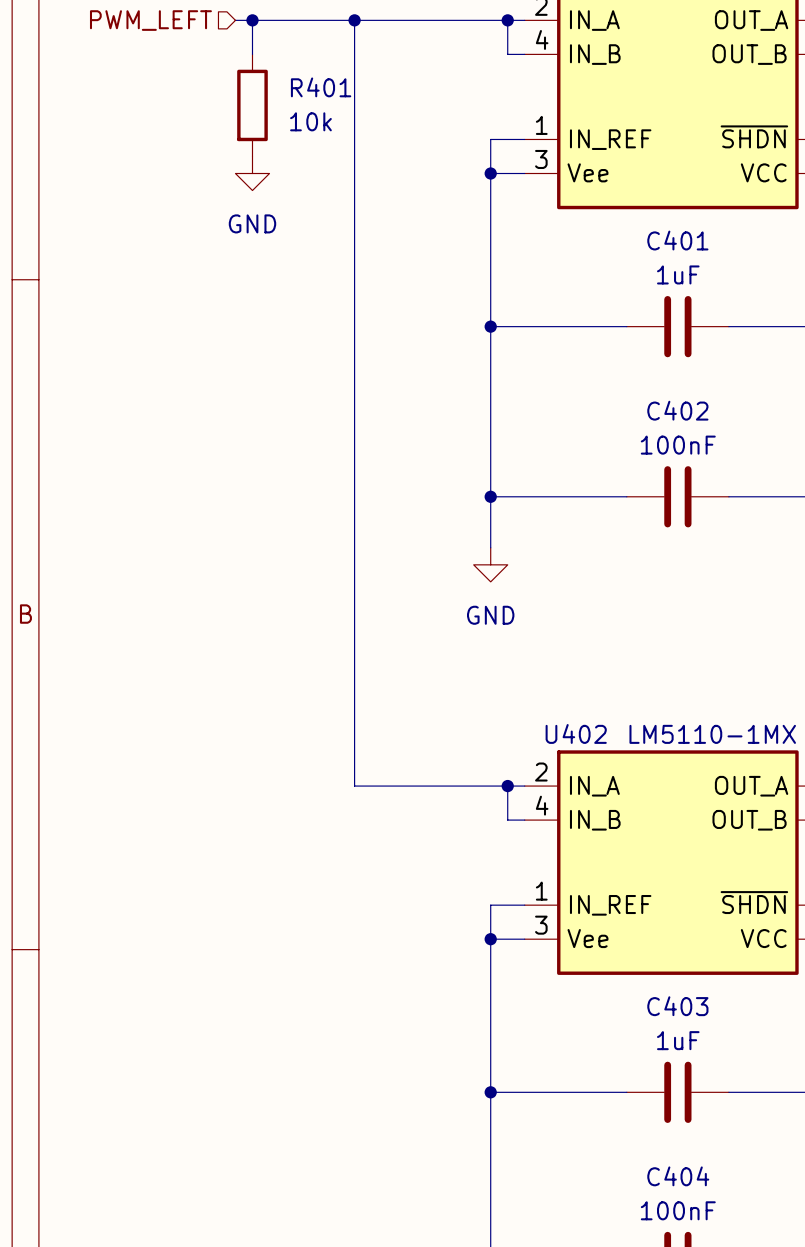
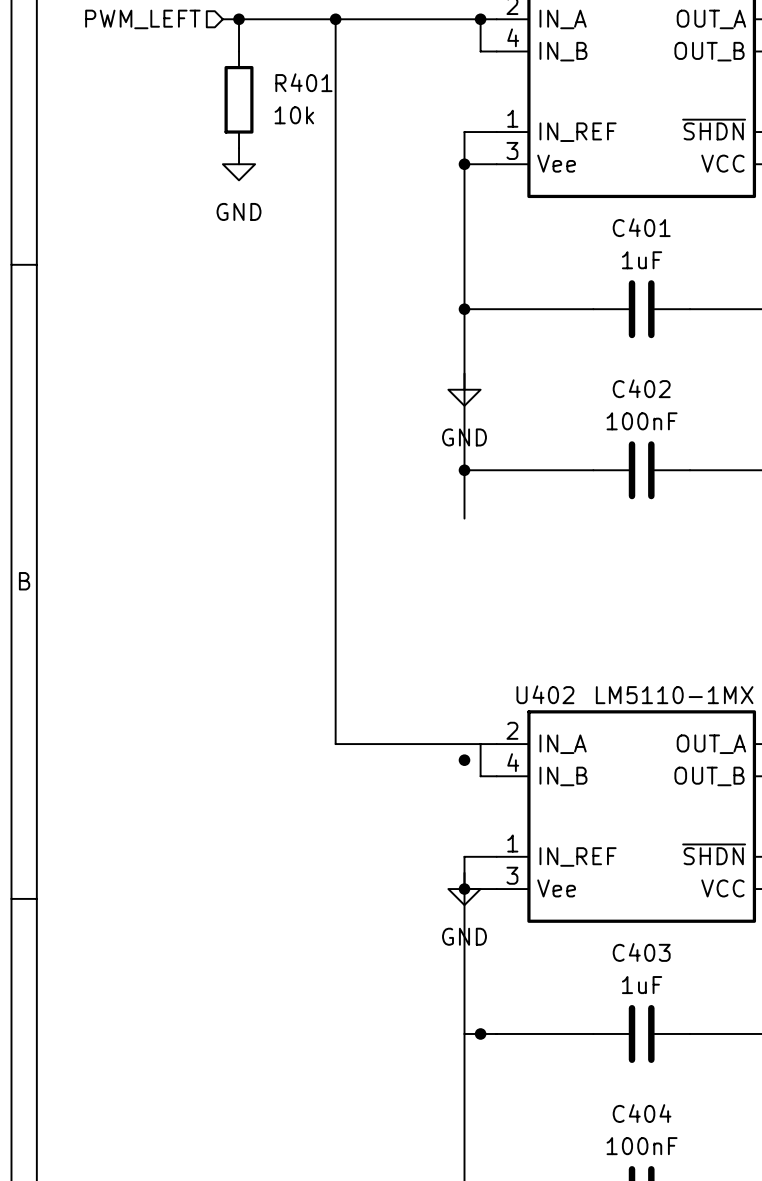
power symbol position: GND (490, 564) -> GND (464, 389)
junction position: (507, 786) -> (464, 760)
power symbol: none -> GND (464, 889)
junction position: (490, 1092) -> (480, 1033)

